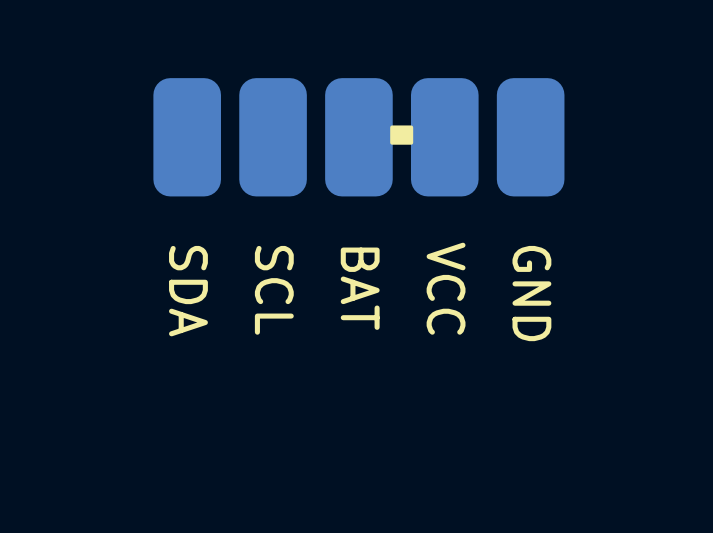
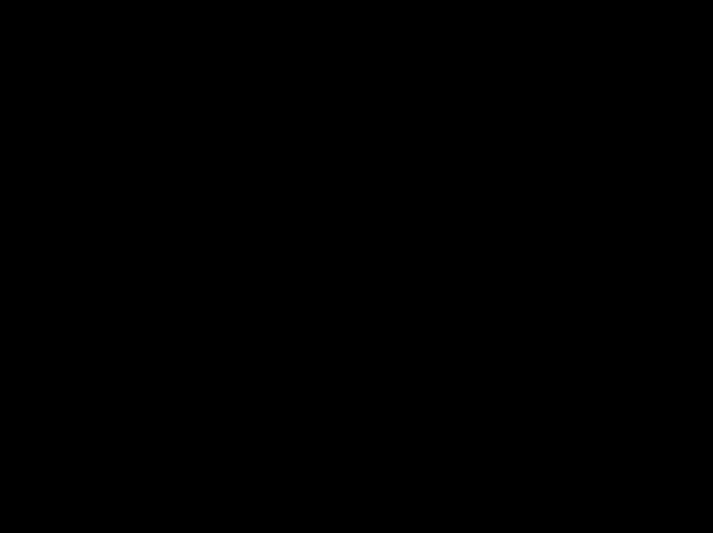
part: (358, 137) -> none

